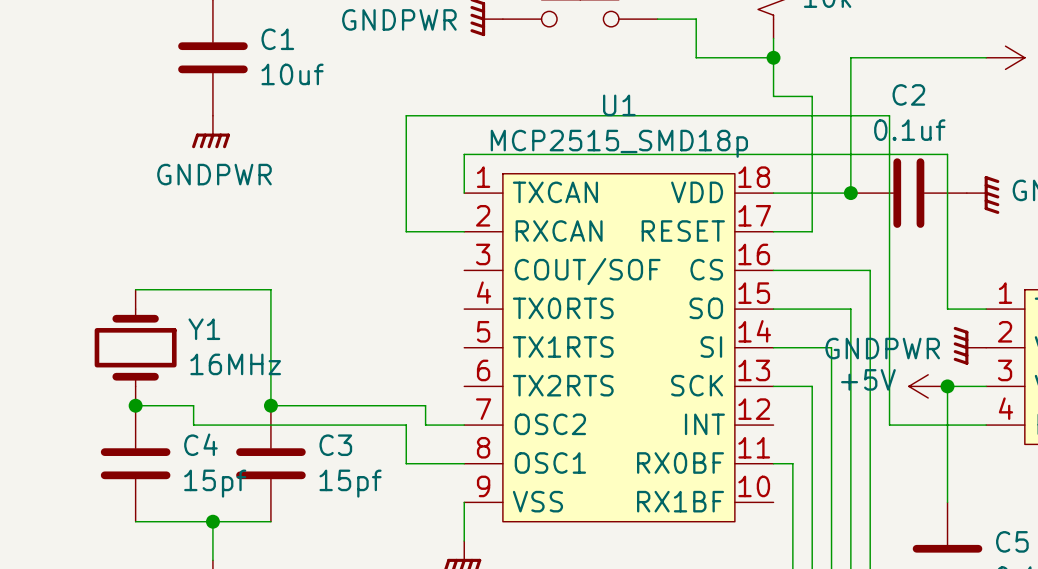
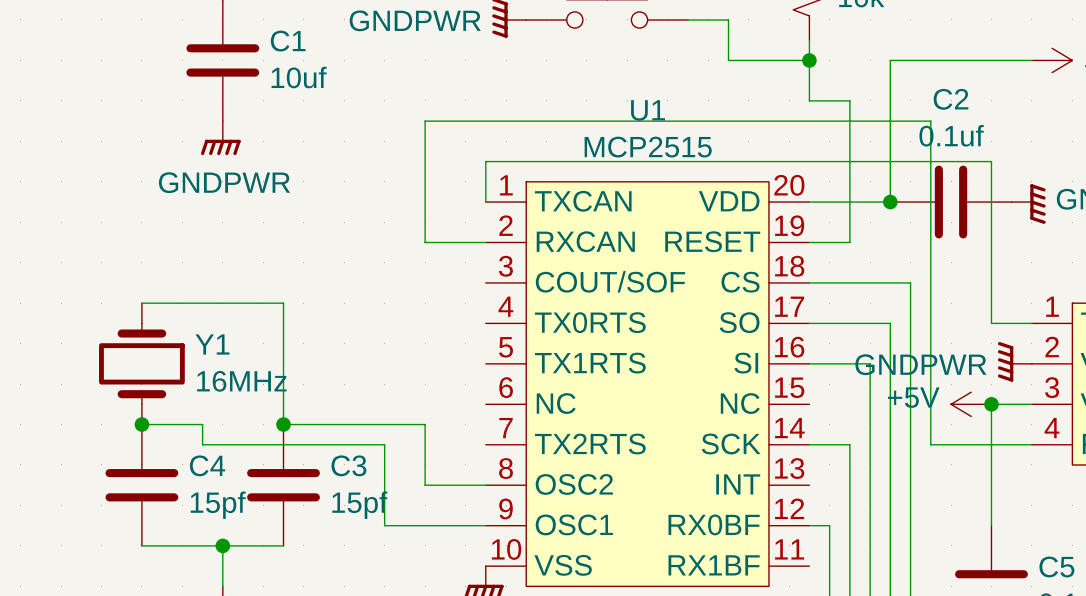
U1 value: MCP2515_SMD18p (619, 143) -> MCP2515 (648, 147)
U1 symbol: [464, 173, 774, 522] -> [485, 181, 810, 587]
wire: (773, 386) (812, 386) (812, 425) -> (809, 444) (849, 444)
wire: (406, 405) (425, 405) (425, 425) (464, 425) -> none
wire: (367, 425) (406, 425) -> (425, 424) (425, 444)
wire: (773, 463) (792, 463) (792, 502) -> (809, 525) (829, 525)
wire: (464, 502) (464, 541) -> (485, 525) (384, 525) (384, 444)

